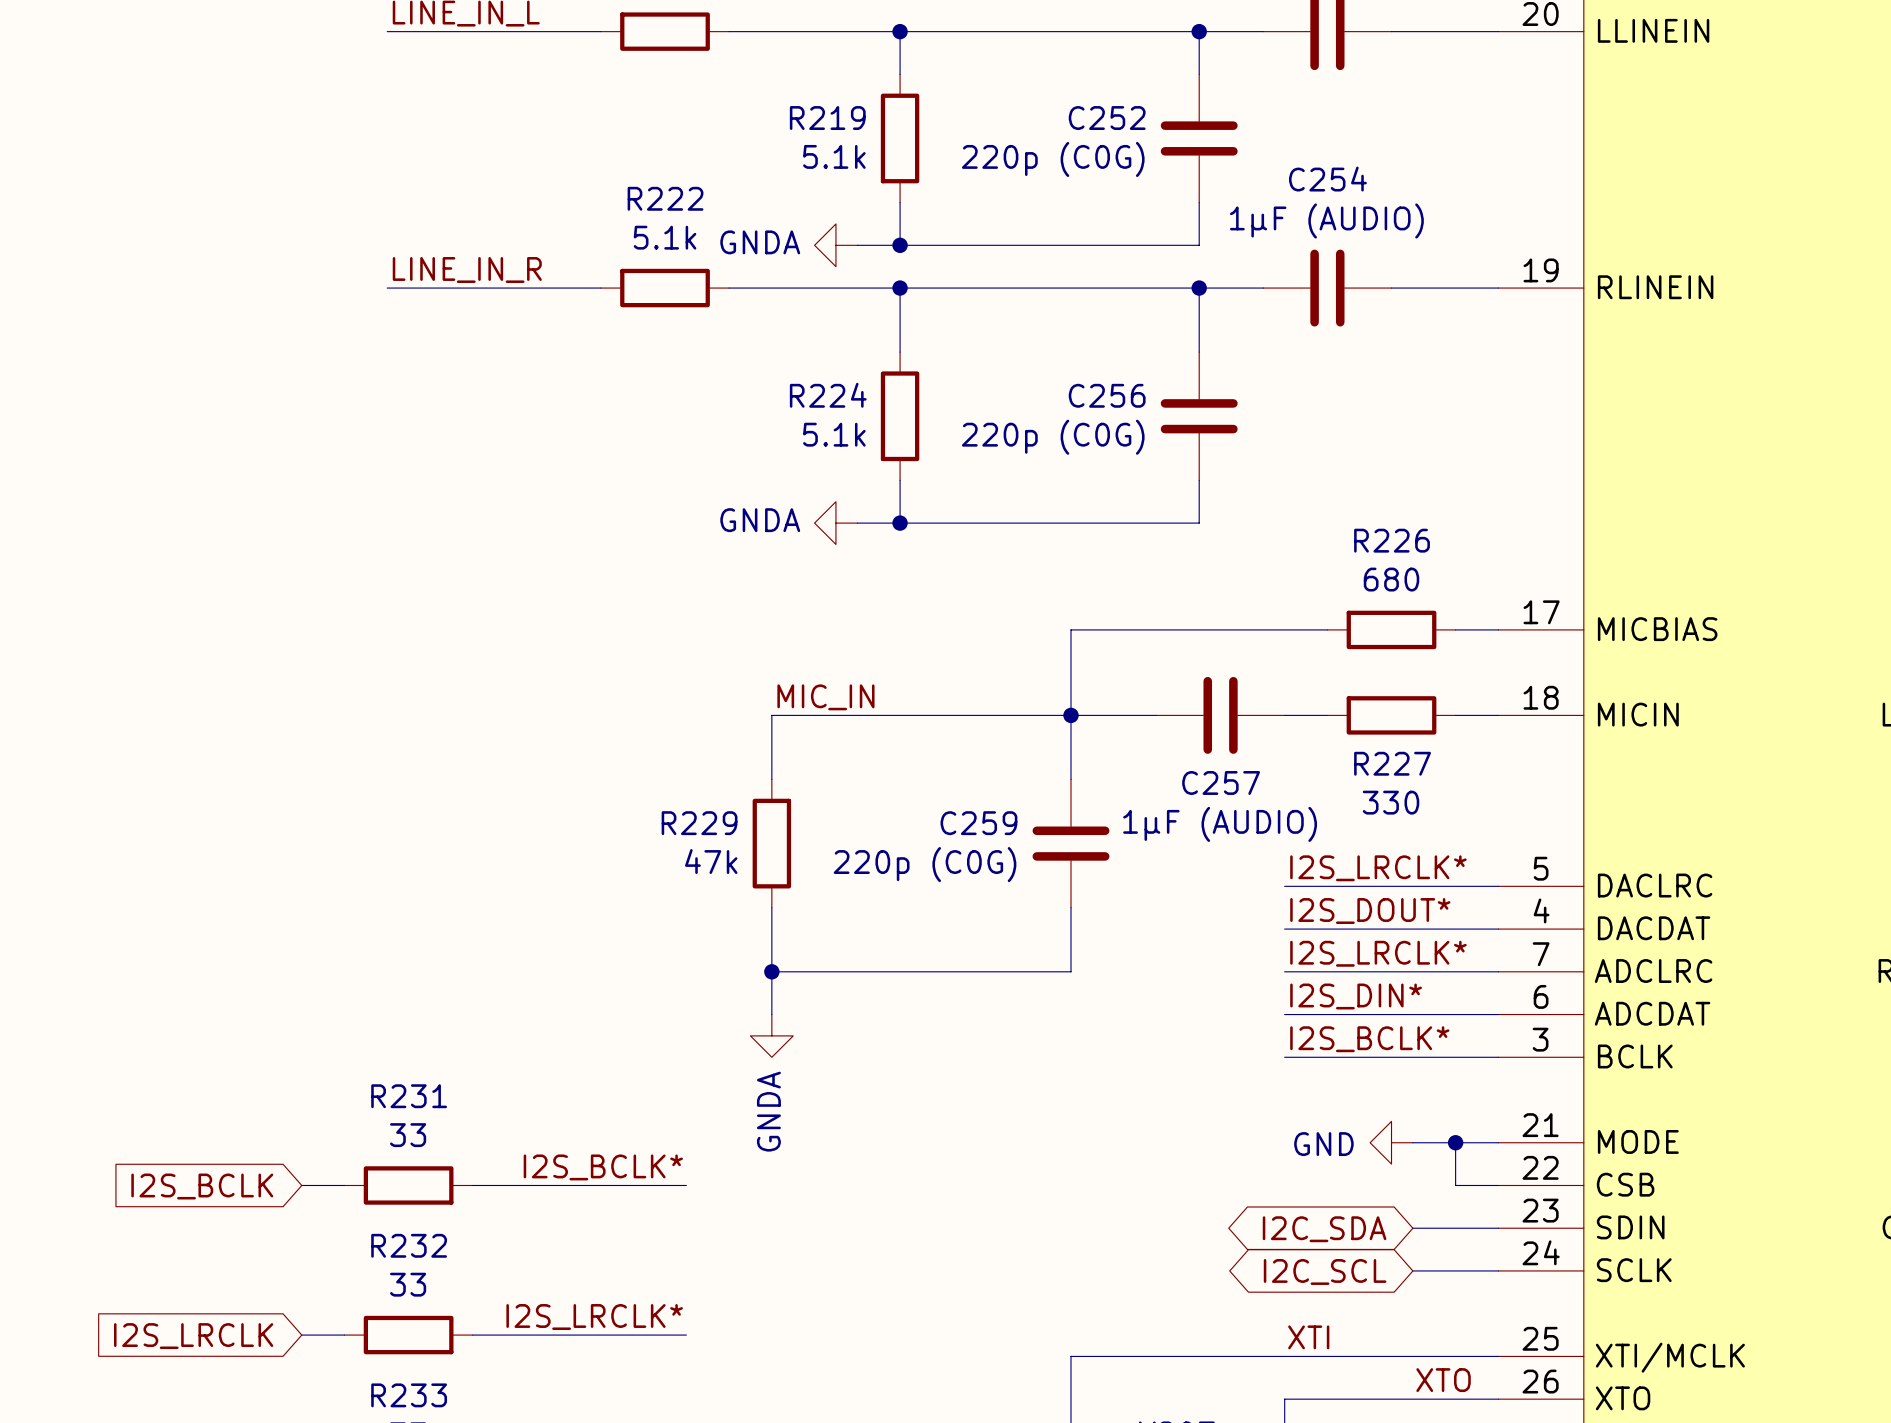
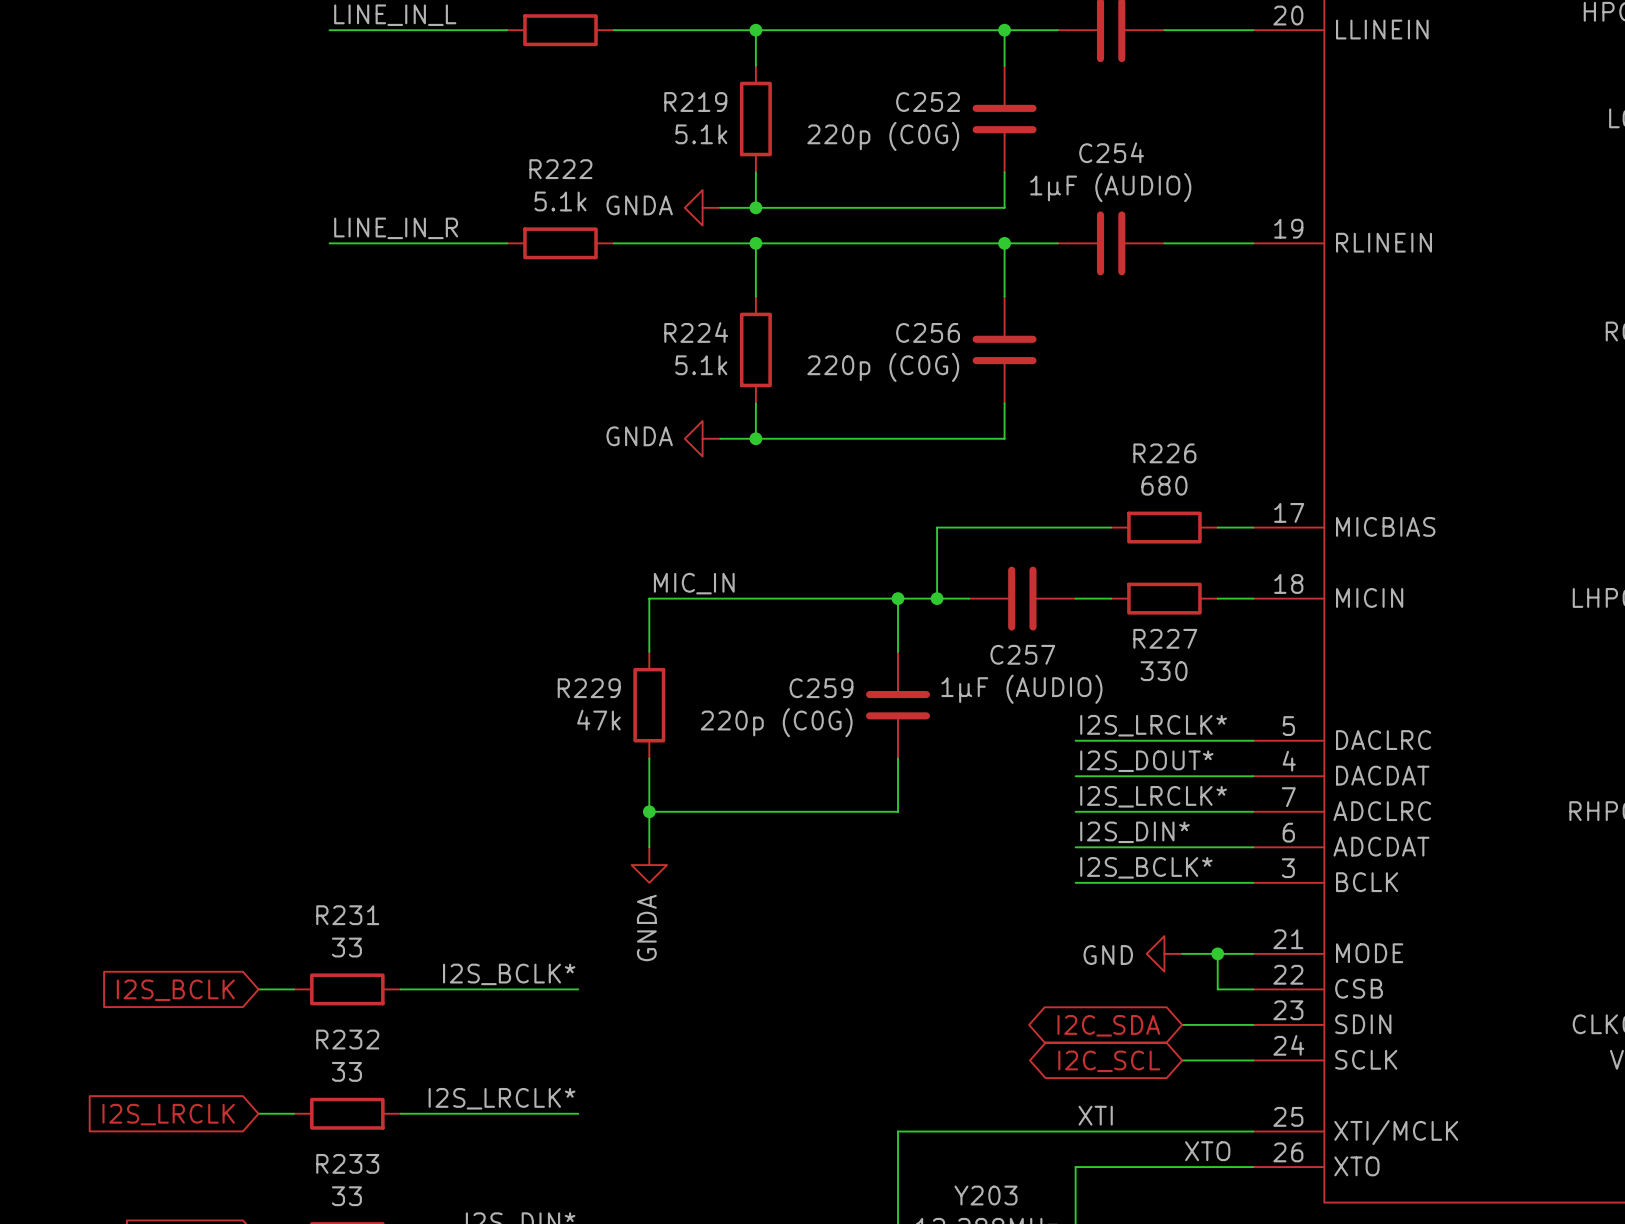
wire: (1118, 629) (1071, 629) (1071, 715) -> (937, 527) (937, 598)
junction: none -> (937, 598)

